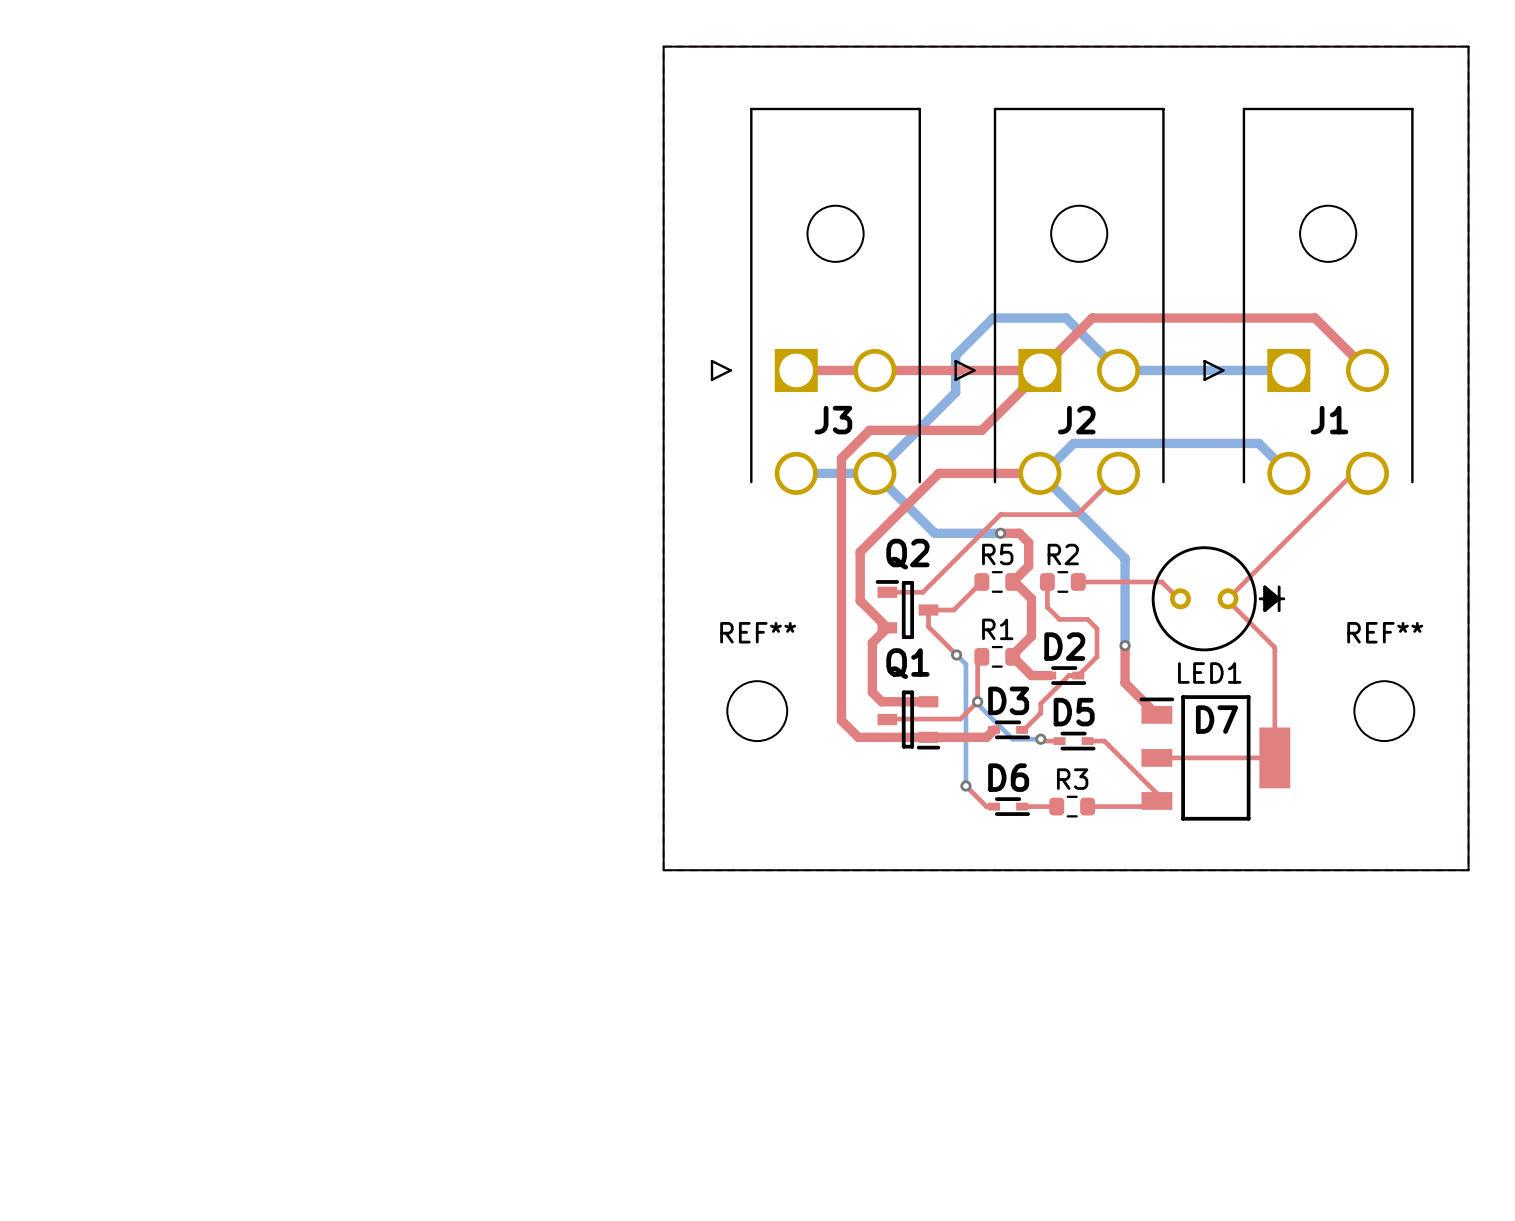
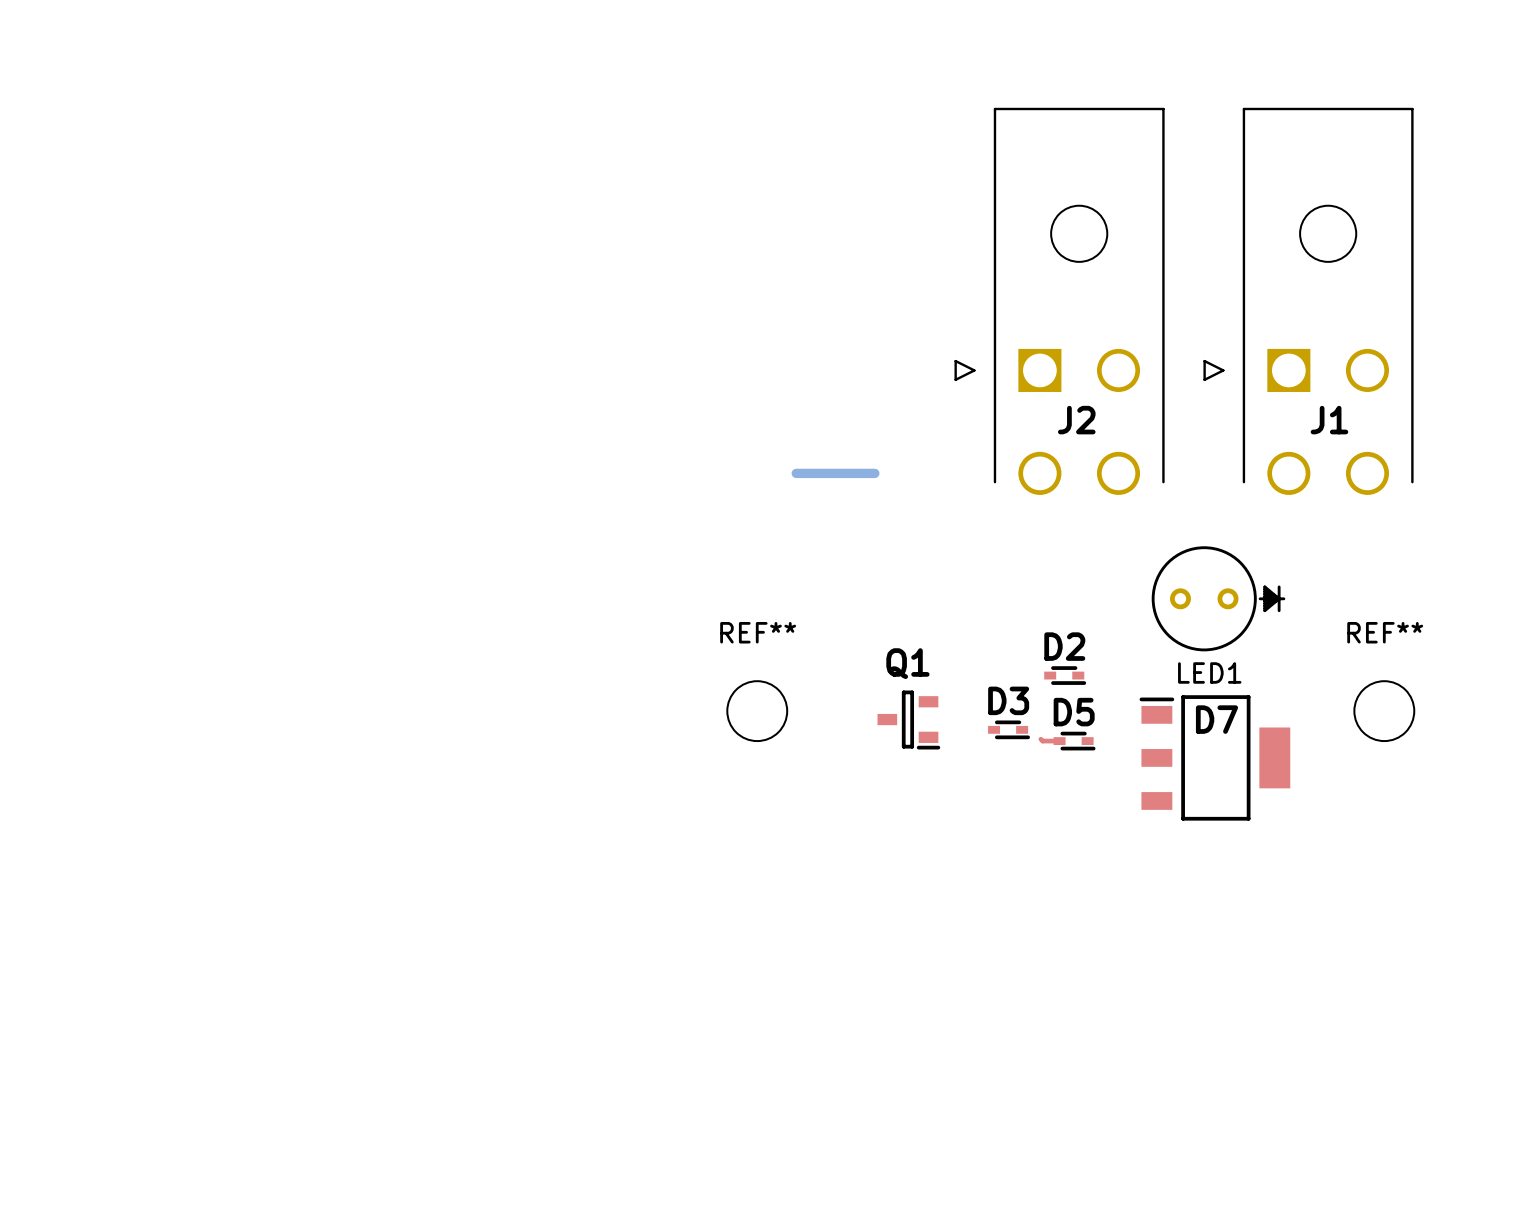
board edge: (663, 46) (1468, 46) (1468, 870) (663, 870) (663, 46) -> none
J3: (815, 301) -> none
top track: (796, 370) (1039, 370) -> none
top track: (1039, 370) (1092, 318) (1315, 318) (1367, 370) -> none
top track: (1039, 370) (981, 430) (869, 430) (841, 458) (841, 720) (858, 737) (986, 737) (994, 729) -> none
bottom track: (1288, 370) (1118, 370) (1066, 318) (993, 318) (955, 355) (955, 392) (874, 473) (934, 533) (1000, 533) -> none
top track: (1039, 473) (938, 473) (860, 552) (860, 600) (887, 627) (872, 642) (872, 692) (881, 701) (928, 701) -> none
top track: (1118, 473) (1077, 514) (1000, 514) (922, 592) (887, 592) -> none
bottom track: (1288, 473) (1258, 443) (1073, 443) (1039, 477) (1039, 473) (1125, 558) (1125, 645) -> none
top track: (1367, 473) (1353, 473) (1228, 598) -> none
top track: (1000, 533) (1019, 533) (1028, 542) (1028, 566) (1012, 581) -> none
via: (1000, 533) -> none
top track: (981, 581) (953, 610) (928, 610) (928, 626) (956, 654) -> none
R5: (997, 581) -> none
top track: (1012, 581) (1031, 598) (1031, 636) (1012, 656) (1031, 675) (1050, 675) -> none
top track: (1047, 581) (1047, 607) (1059, 619) (1087, 619) (1096, 628) (1096, 656) (1078, 675) (1068, 675) (1040, 703) (1040, 712) (1022, 731) -> none
R2: (1062, 581) -> none
top track: (1078, 581) (1161, 581) (1180, 600) -> none
top track: (1228, 600) (1274, 647) (1274, 750) -> none
Q2: (907, 609) -> none
top track: (1125, 645) (1125, 683) (1156, 714) -> none
via: (1125, 645) -> none
bottom track: (956, 654) (965, 664) (965, 785) -> none
via: (956, 654) -> none
R1: (997, 656) -> none
top track: (984, 659) (981, 656) (977, 661) (977, 701) (960, 719) (887, 719) -> none
bottom track: (977, 701) (975, 701) (1012, 739) (1040, 739) -> none
via: (977, 701) -> none
via: (1040, 739) -> none
top track: (1087, 741) (1104, 741) (1156, 793) (1143, 806) (1087, 806) -> none
top track: (1156, 757) (1274, 757) -> none
top track: (965, 785) (986, 806) (994, 806) -> none
via: (965, 785) -> none
D6: (1009, 806) -> none
top track: (1022, 806) (1056, 806) -> none
R3: (1072, 806) -> none

